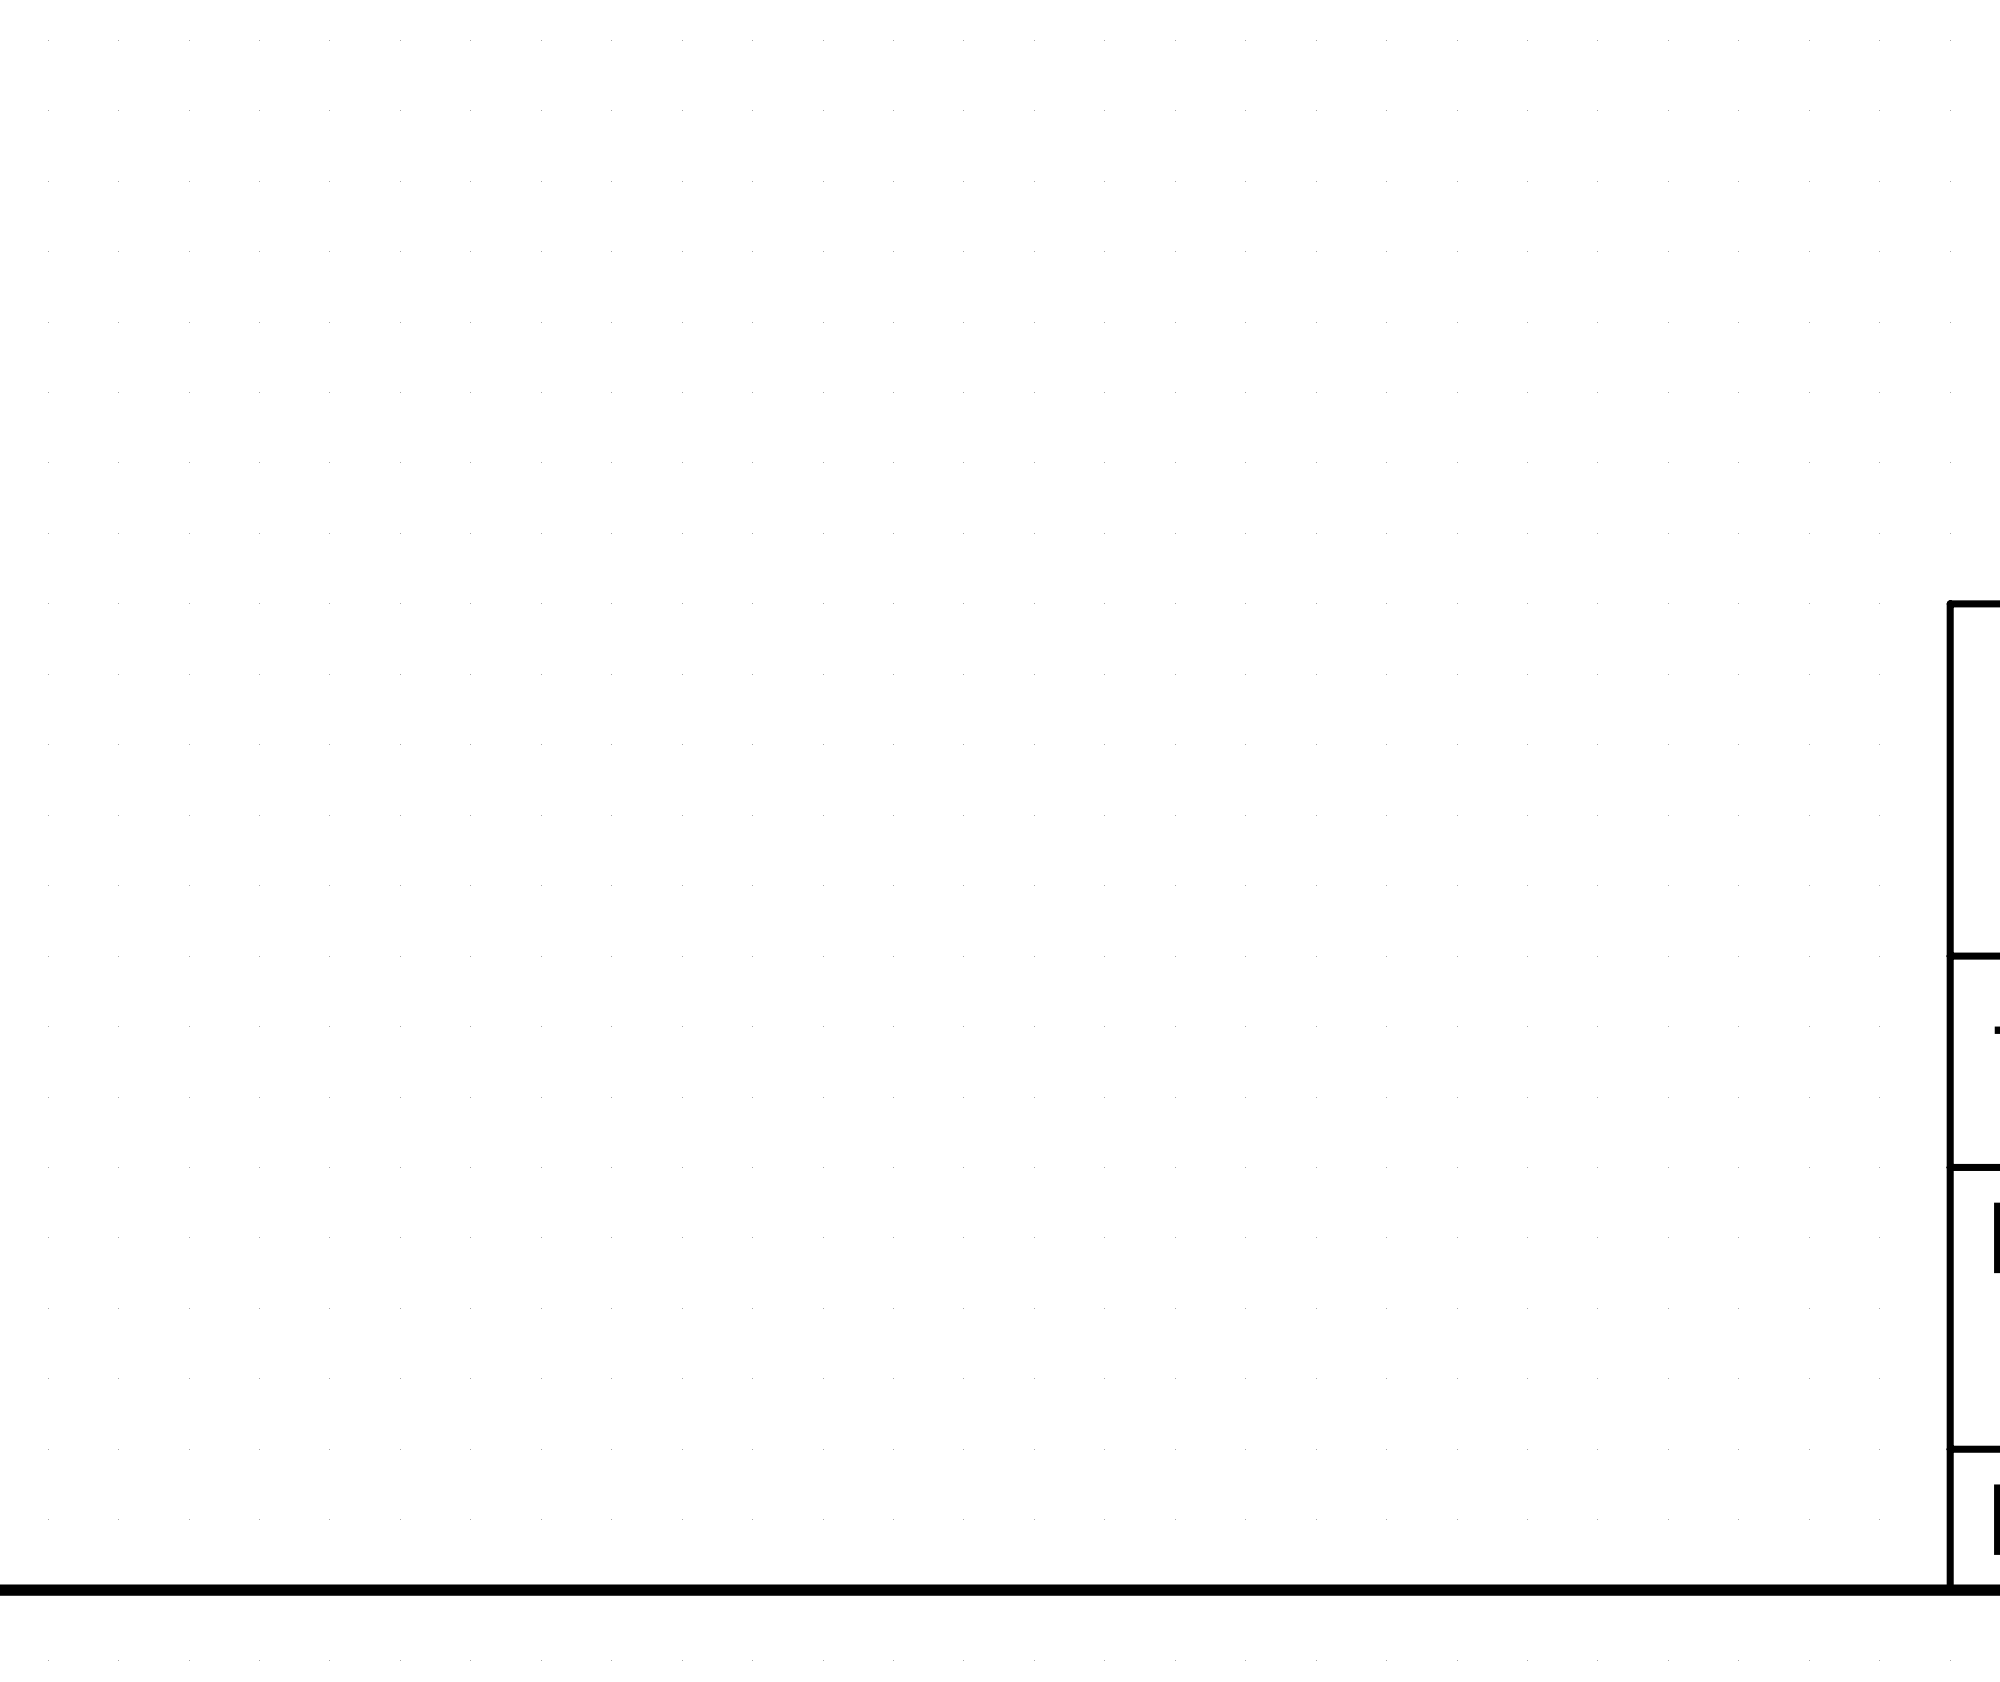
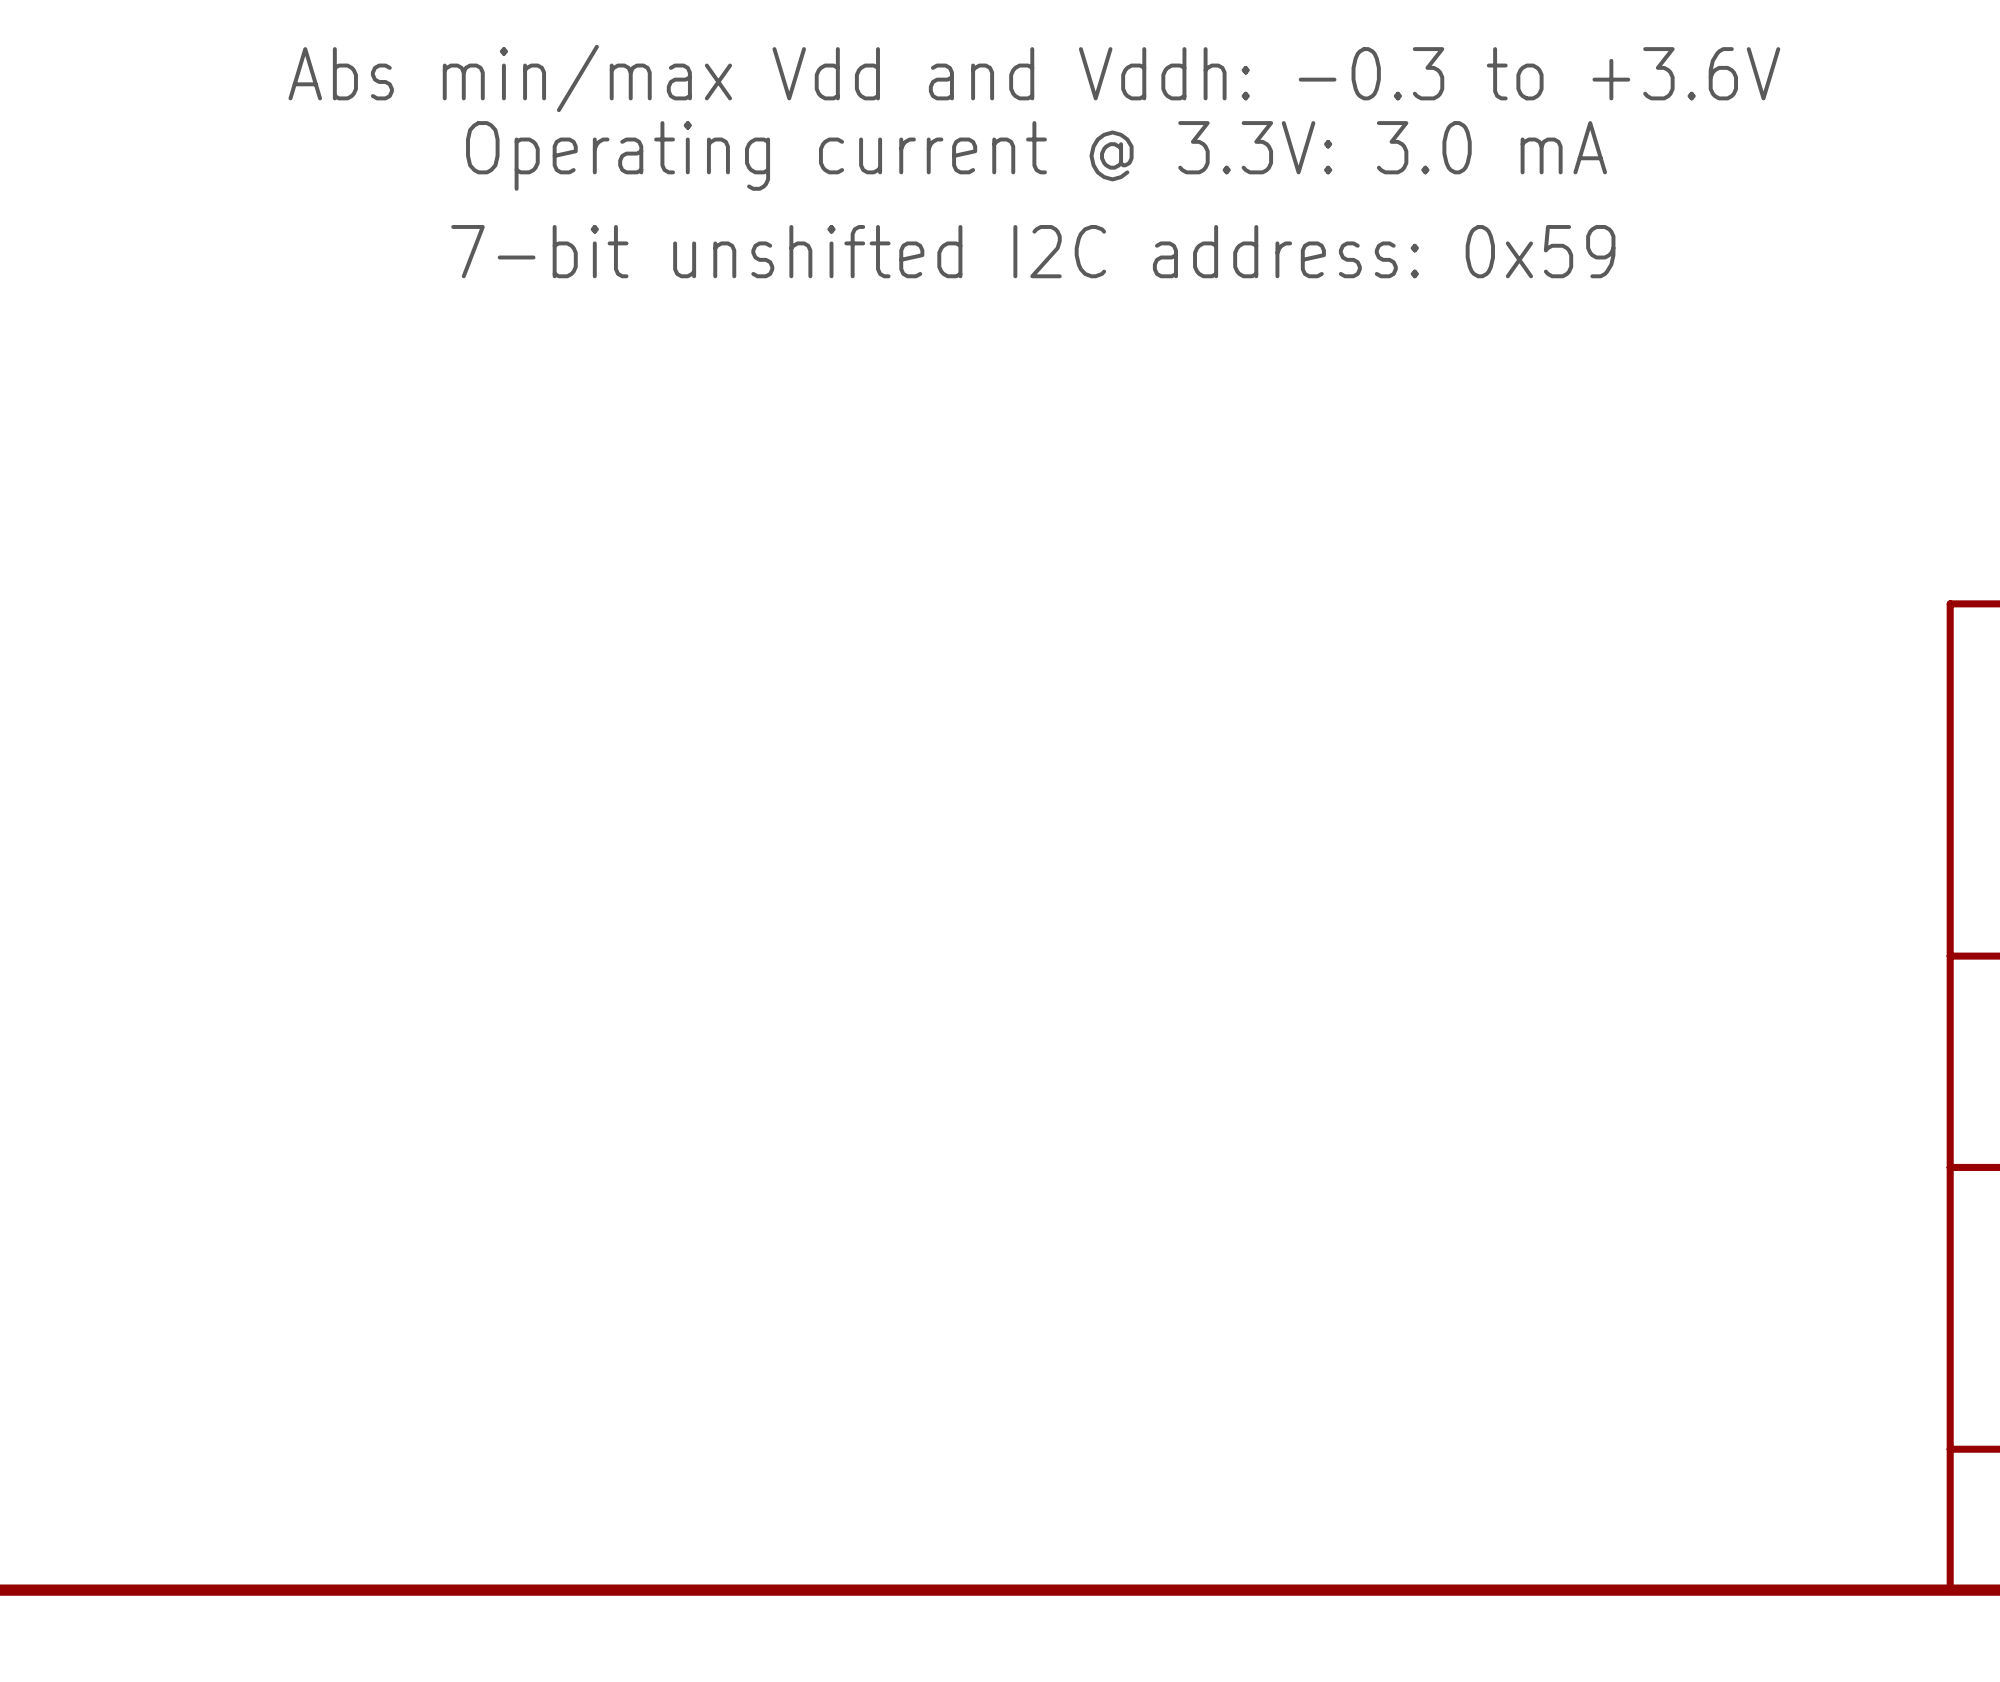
text: none -> Abs min/max Vdd and Vddh: -0.3 to +3.6V (1034, 78)
text: none -> Operating current @ 3.3V: 3.0 mA (1036, 155)
text: none -> 7-bit unshifted I2C address: 0x59 (1033, 251)

